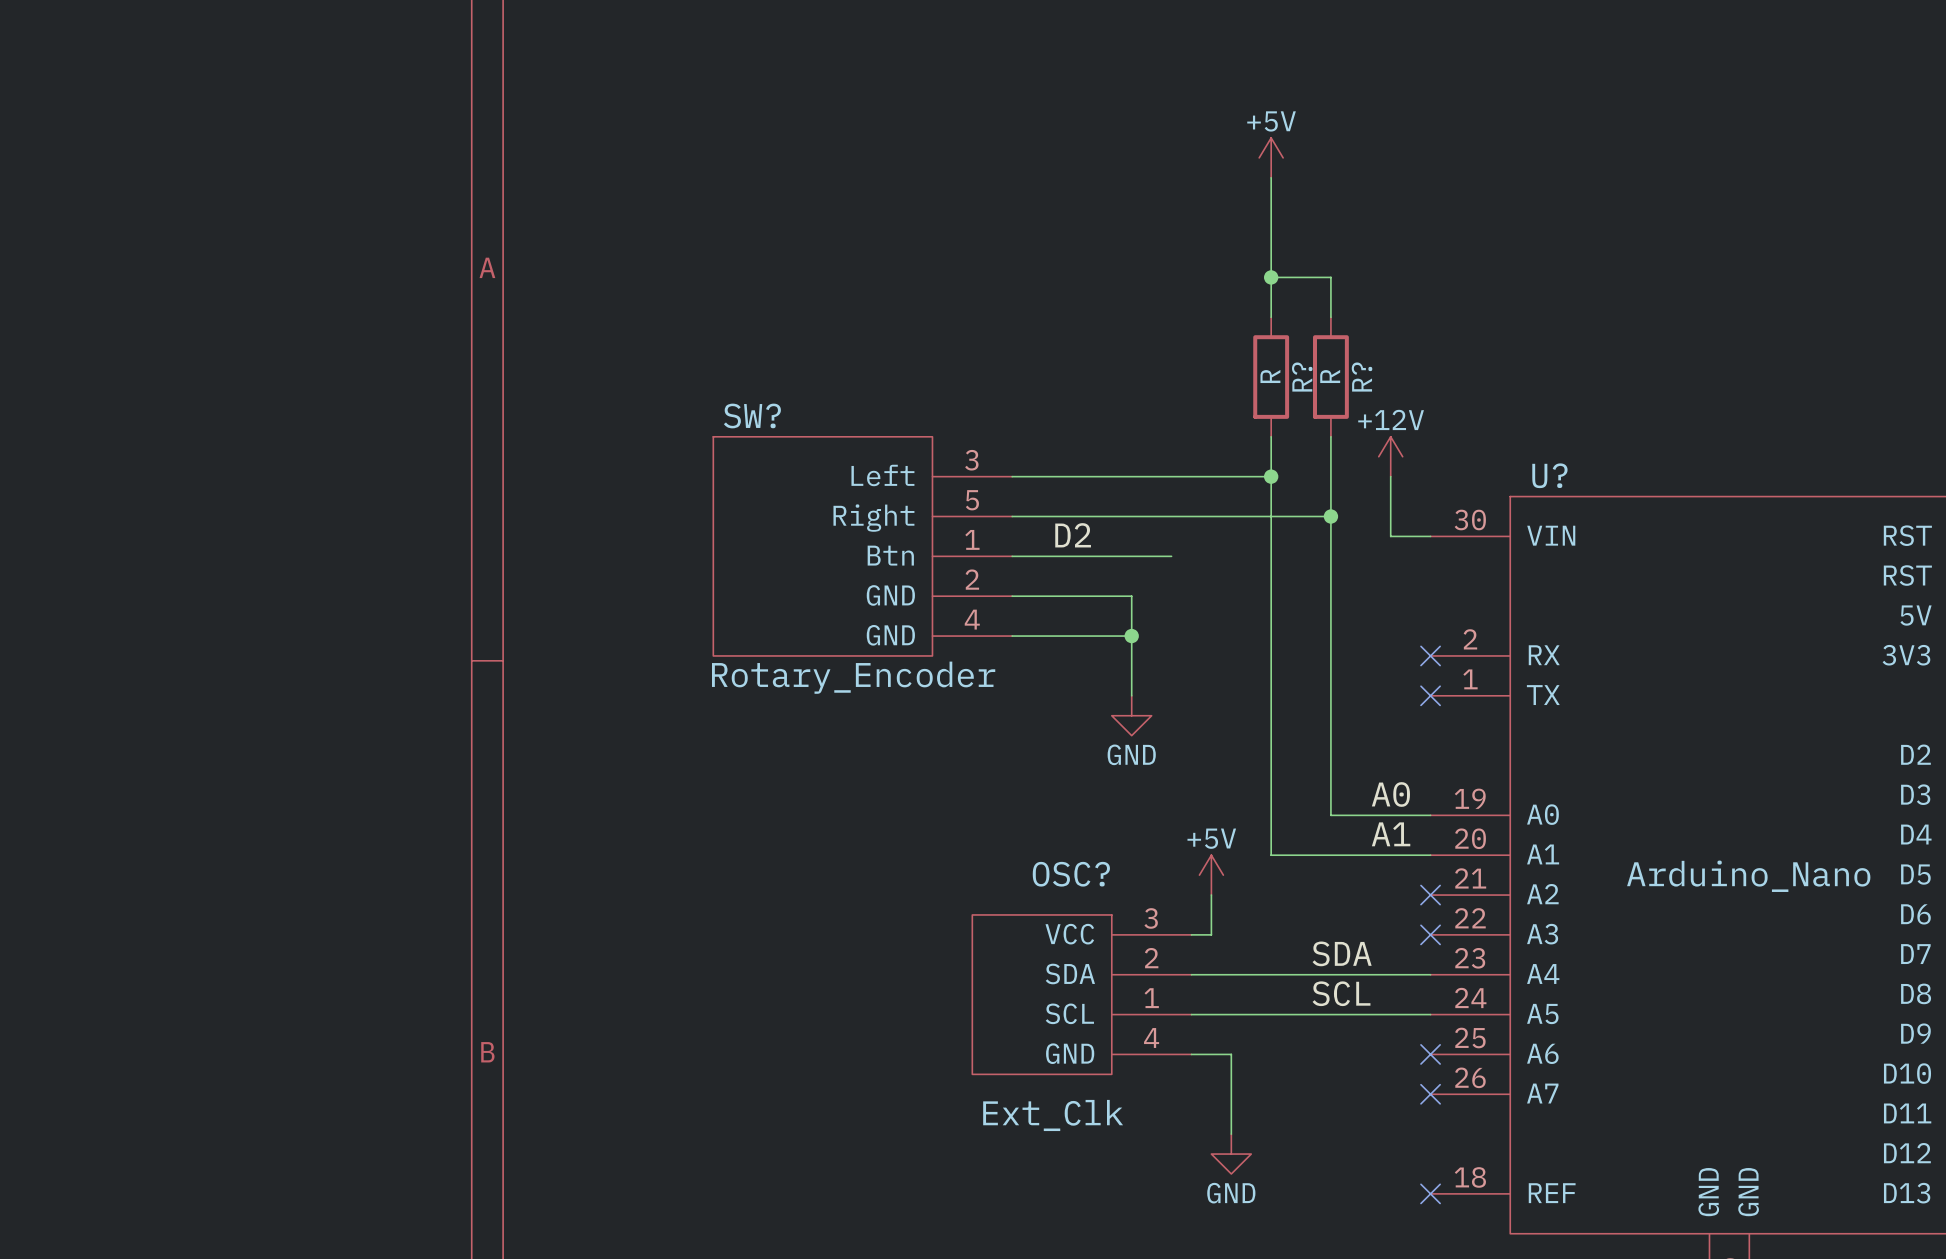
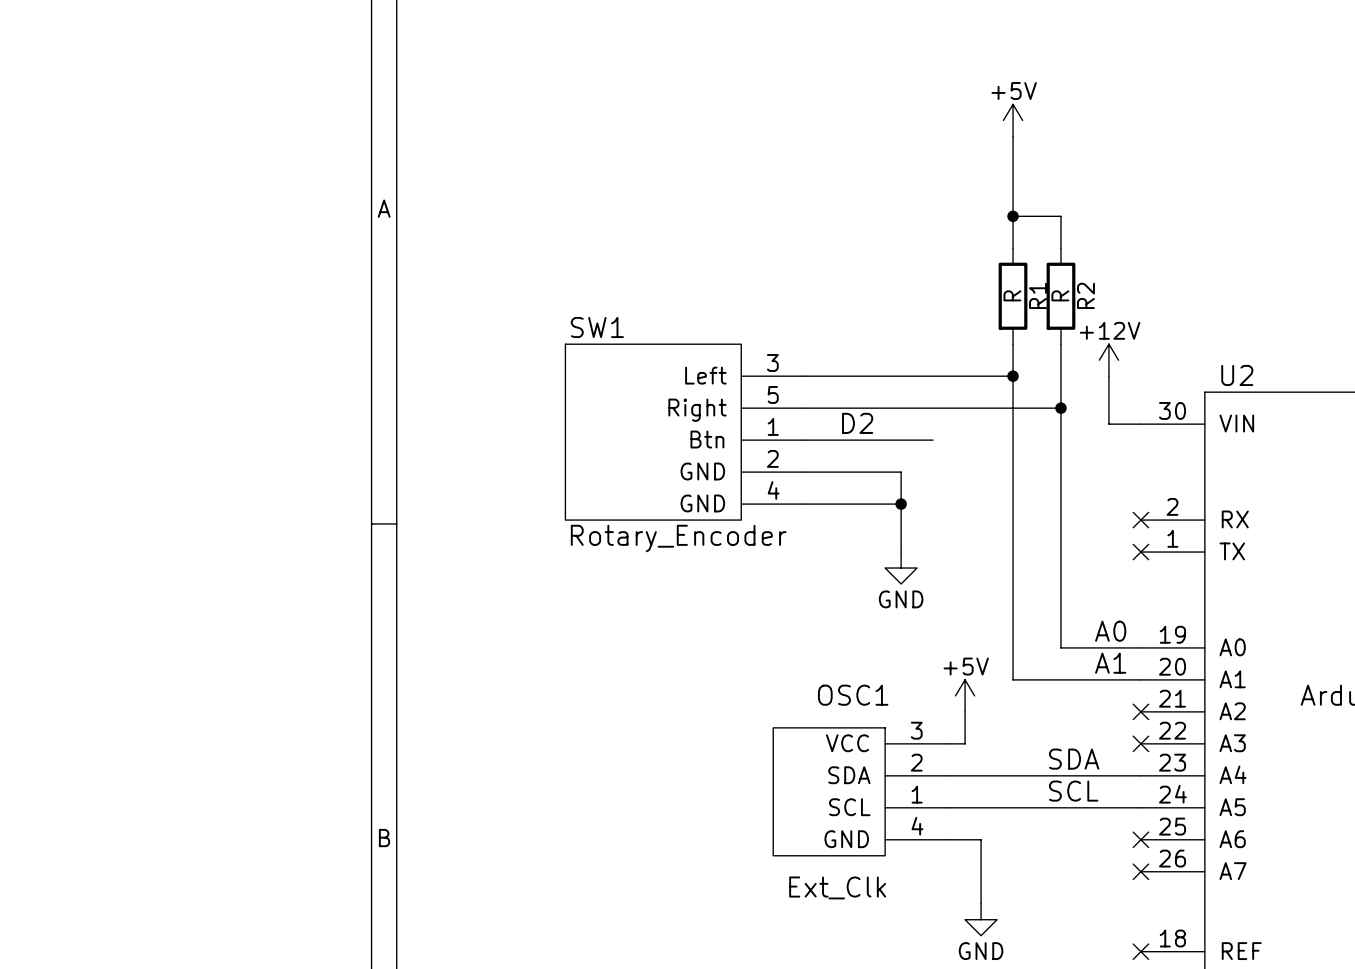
R? name: R? (1302, 377) -> R1 (1038, 295)
R? name: R? (1362, 377) -> R2 (1085, 295)
SW? name: SW? (752, 415) -> SW1 (597, 327)
U? name: U? (1549, 475) -> U2 (1237, 375)
OSC? name: OSC? (1071, 874) -> OSC1 (853, 695)

